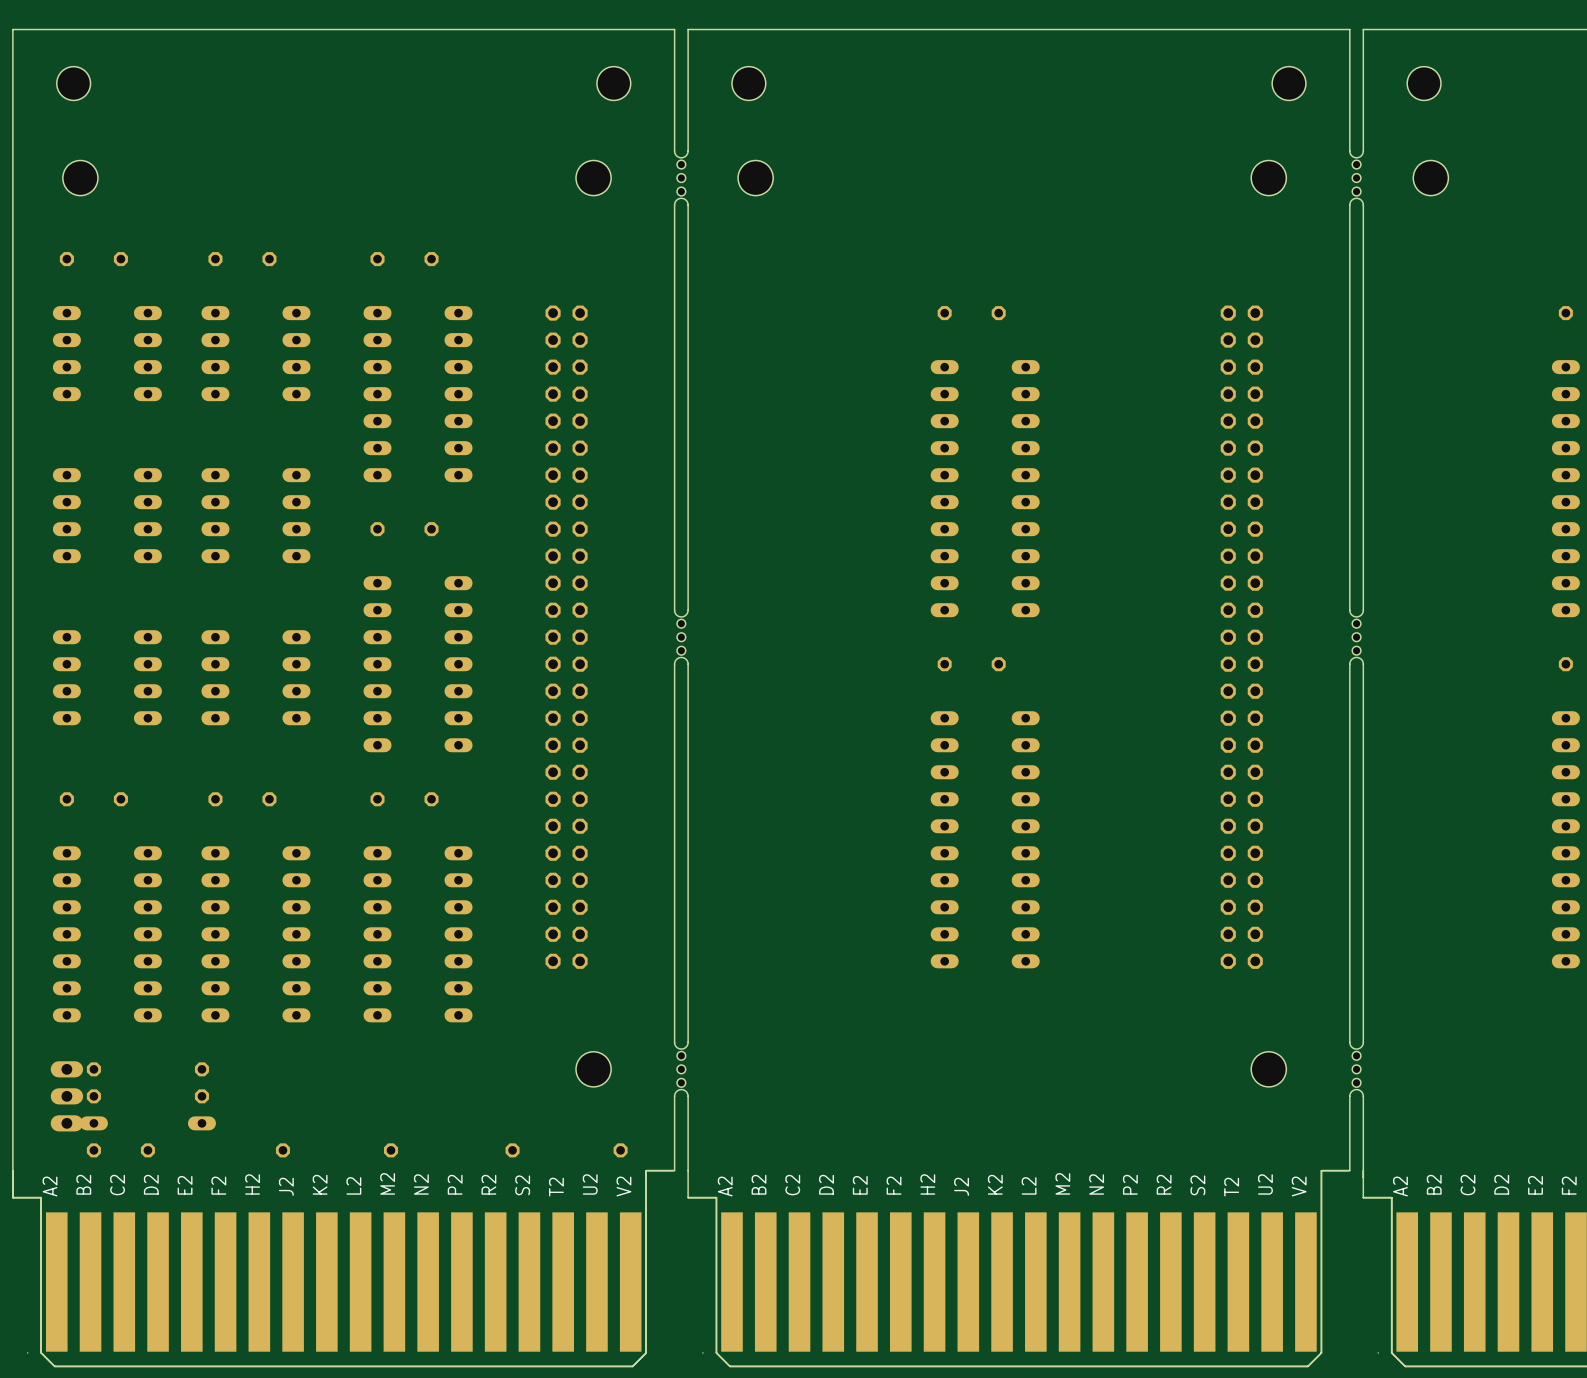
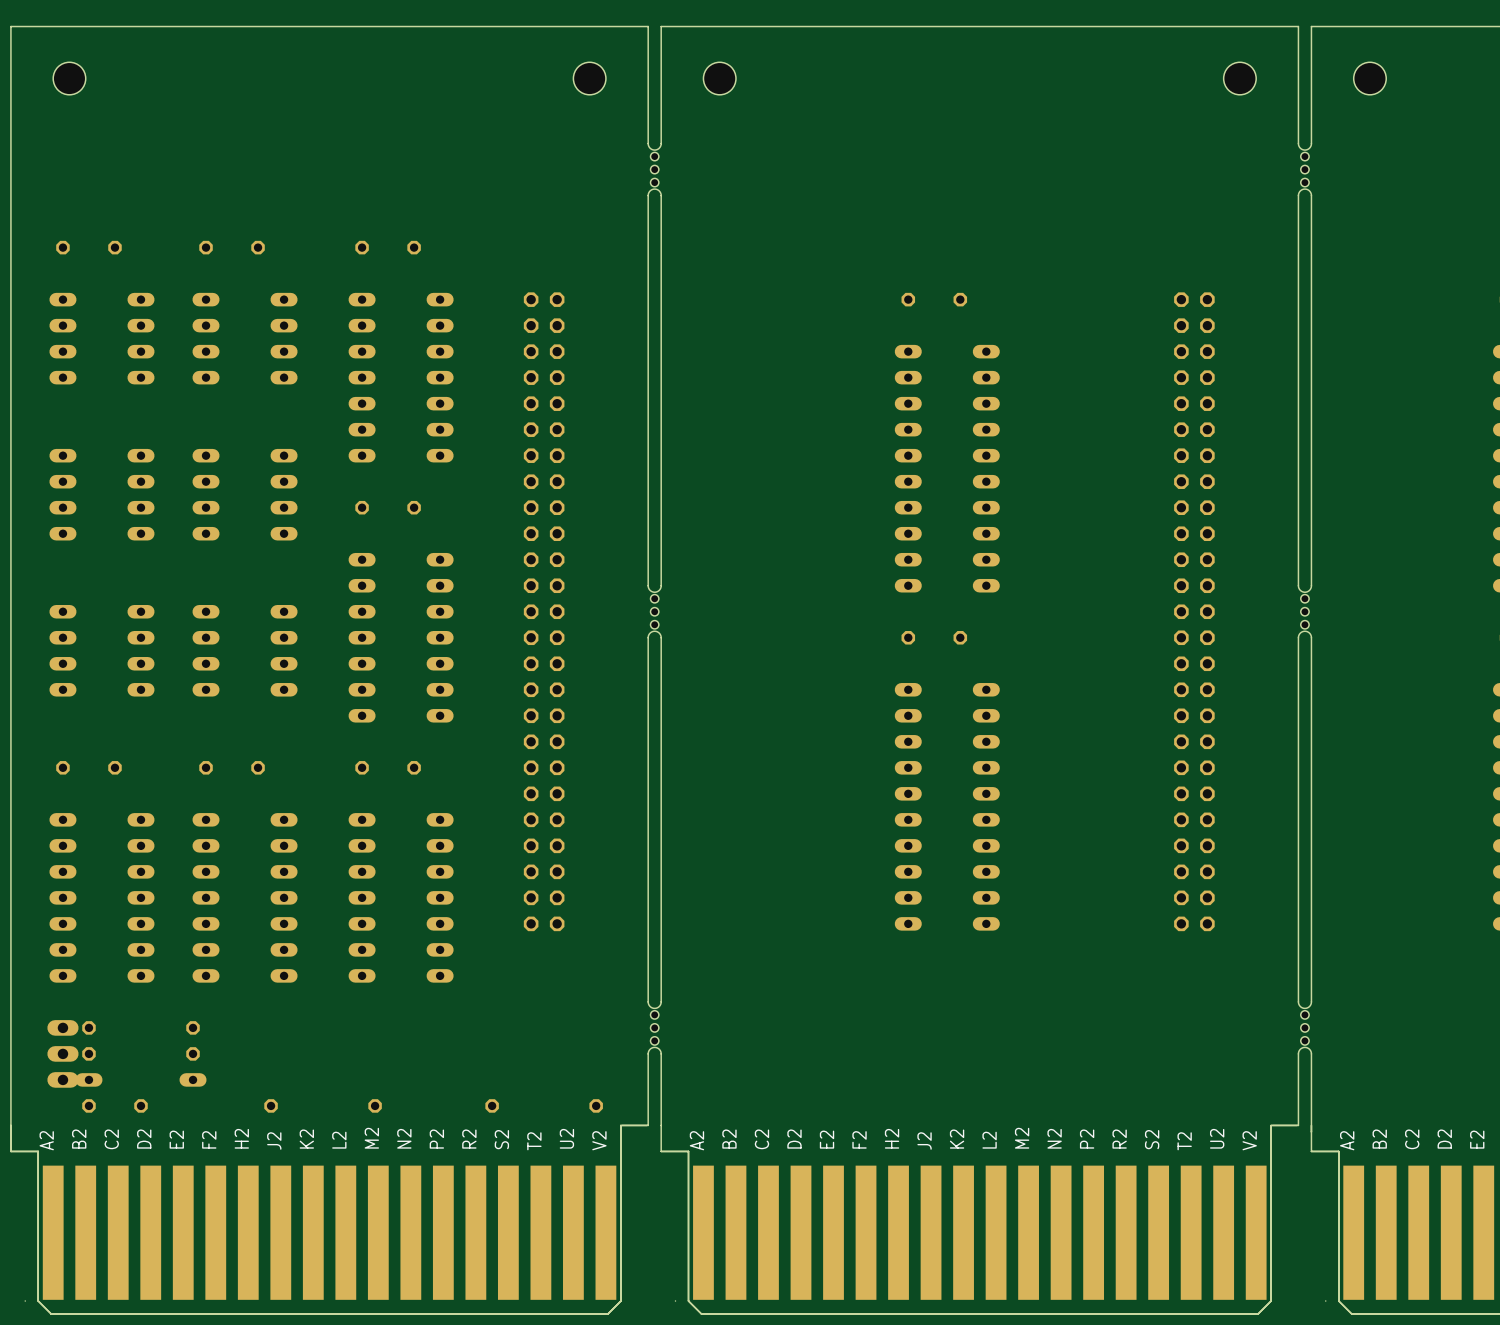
part: (80, 178) -> none
part: (593, 178) -> none
part: (755, 178) -> none
part: (1268, 178) -> none
part: (1430, 178) -> none
part: (593, 1069) -> none
part: (1268, 1069) -> none

